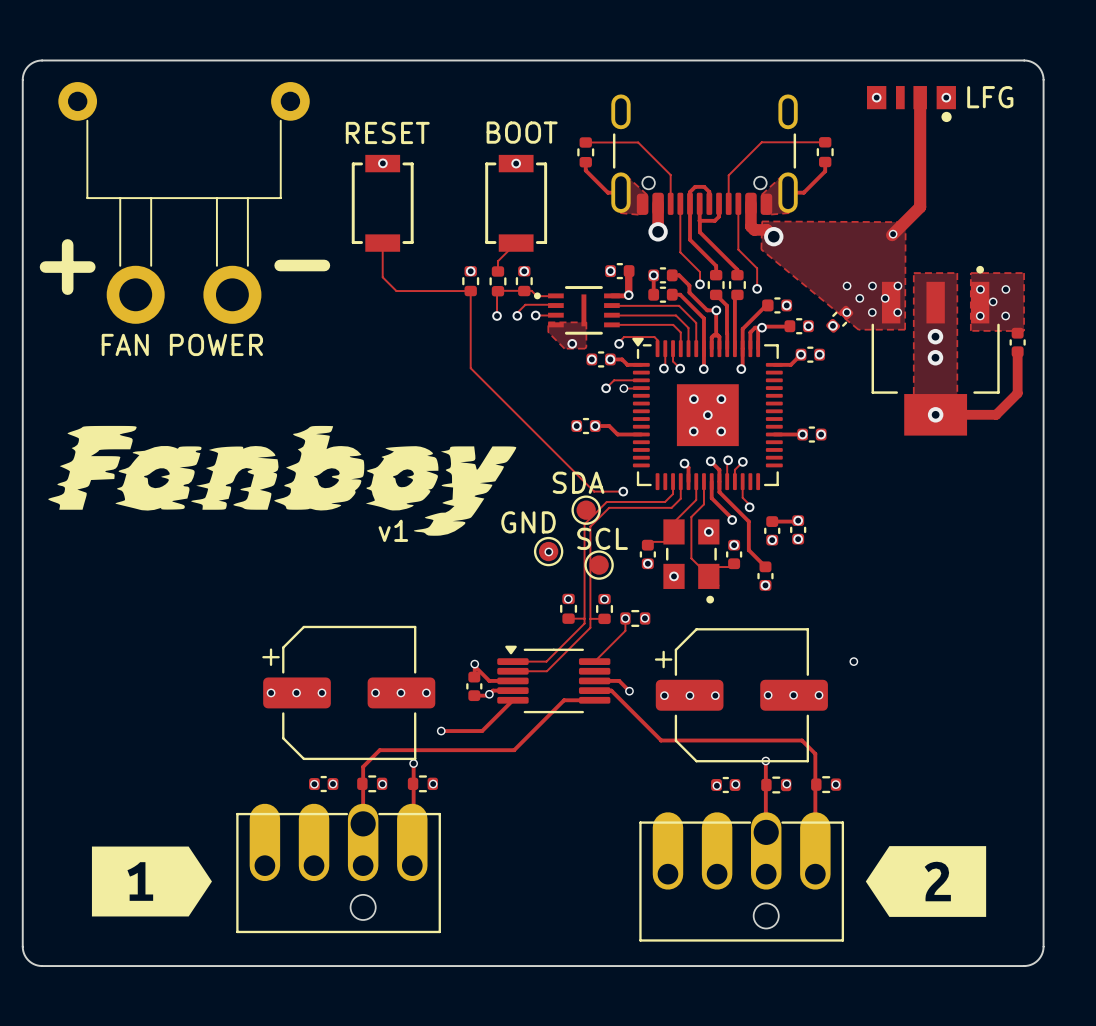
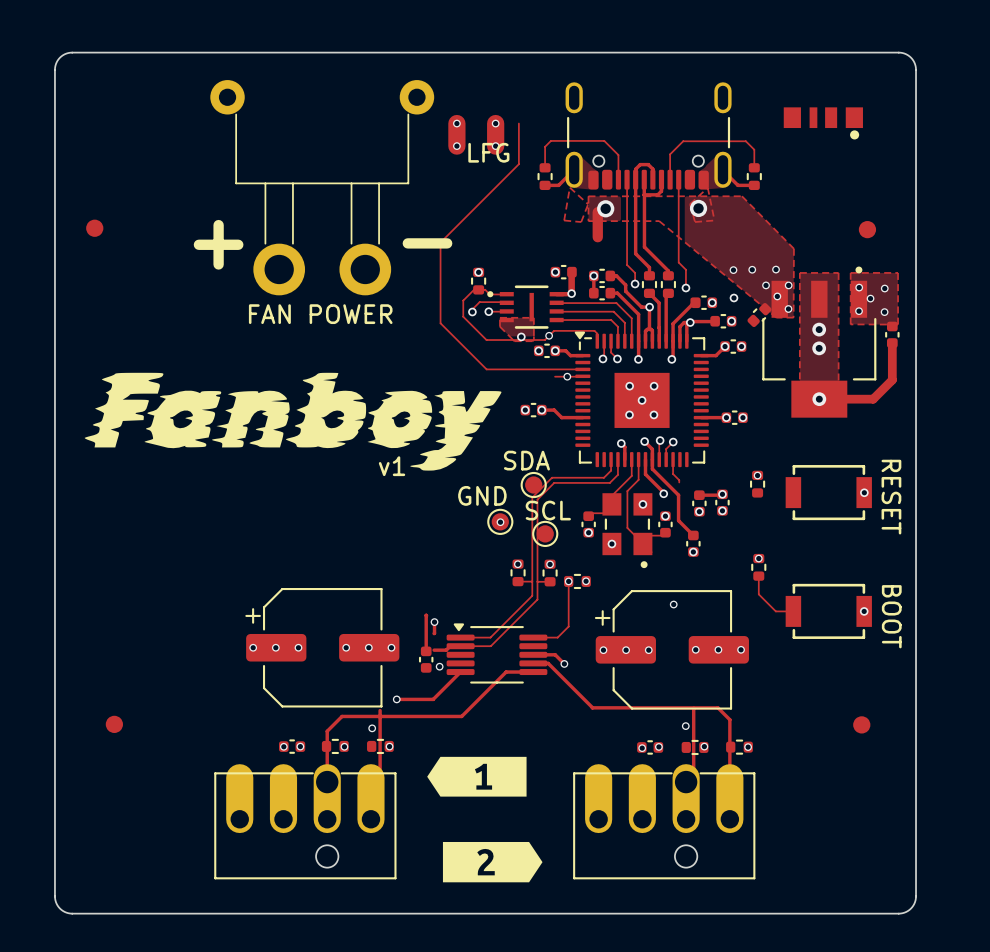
board edge: (42, 60) (1024, 60) (1037, 66) (1043, 79) (1043, 946) (1037, 960) (1024, 966) (42, 966) (28, 960) (22, 946) (22, 79) (28, 66) (42, 60) -> (72, 52) (60, 57) (54, 69) (54, 896) (60, 908) (72, 913) (898, 913) (910, 908) (916, 896) (916, 69) (910, 57) (898, 52) (72, 52)
via: (876, 97) -> none
track: (920, 97) (920, 207) (892, 235) -> none
via: (946, 97) -> none
text position: LFG (990, 97) -> LFG (488, 152)
track: none -> (456, 123) (456, 146)
via: none -> (456, 123)
track: none -> (495, 123) (495, 146)
via: none -> (495, 123)
via: none -> (456, 146)
via: none -> (495, 146)
text: RESET (387, 132) -> none
text: BOOT (522, 132) -> none
track: (585, 142) (638, 142) (670, 174) (670, 203) -> none
track: (825, 142) (761, 142) (728, 175) (728, 203) -> none
part position: (585, 152) -> (545, 176)
part position: (825, 152) -> (754, 176)
track: none -> (545, 167) (545, 146) (550, 140) (604, 140) (618, 155) (618, 179)
track: none -> (754, 167) (754, 149) (745, 141) (683, 141) (670, 154) (670, 179)
part position: (704, 154) -> (648, 135)
track: none -> (574, 169) (558, 185) (545, 185)
track: none -> (722, 169) (737, 185) (754, 185)
track: (585, 162) (585, 170) (607, 192) (620, 192) -> none
track: (825, 162) (825, 171) (803, 192) (788, 192) -> none
via: (382, 163) -> none
via: (516, 163) -> none
zone outline: none -> (742, 196) (793, 248) (793, 317) (776, 317) (659, 221) (588, 221) (588, 196) (742, 196)
part position: (184, 202) -> (322, 187)
part: (382, 203) -> none
part: (516, 203) -> none
track: (680, 203) (680, 252) (690, 262) -> (627, 179) (627, 264)
track: (750, 203) (750, 226) (754, 229) (767, 229) (773, 236) -> none
track: (737, 204) (738, 249) (749, 260) -> (678, 180) (678, 262)
track: (699, 205) (699, 220) (714, 220) (719, 216) (719, 205) -> (644, 181) (644, 194) (657, 194) (661, 191) (661, 181)
track: (709, 205) (709, 192) (704, 186) (695, 186) (690, 192) (690, 239) (700, 250) -> (652, 181) (652, 169) (648, 164) (640, 164) (635, 169) (635, 253)
part: none -> (94, 228)
track: (699, 221) (699, 232) (710, 242) -> (644, 195) (644, 247)
zone outline: (762, 221) (761, 249) (858, 329) (905, 329) (905, 222) (762, 221) -> none
part: none -> (867, 229)
via position: (658, 231) -> (605, 208)
via: (893, 234) -> none
via position: (773, 236) -> (698, 208)
track: (382, 243) (382, 277) (396, 291) (470, 291) (470, 368) (594, 491) (623, 491) -> none
track: (516, 243) (497, 261) (497, 271) -> none
text position: - (302, 265) -> - (427, 243)
text position: + (67, 267) -> + (218, 244)
via: none -> (733, 270)
via: none -> (752, 269)
via: none -> (776, 269)
via: (470, 271) -> none
zone outline: (913, 273) (957, 273) (957, 405) (913, 405) (913, 273) -> (799, 272) (838, 272) (838, 390) (799, 390) (799, 272)
zone outline: (970, 273) (1024, 273) (1024, 331) (970, 330) (970, 273) -> (850, 272) (898, 272) (898, 324) (850, 324) (850, 272)
part: (470, 281) -> none
part: (497, 281) -> none
via: (897, 286) -> none
via: none -> (859, 287)
via: (1005, 289) -> none
track: (531, 290) (498, 290) (497, 315) -> none
via: (885, 298) -> none
via: none -> (870, 298)
via: (993, 301) -> none
via: (846, 312) -> none
via: (897, 312) -> none
via: none -> (859, 311)
via: (497, 315) -> none
via: (1005, 315) -> none
via position: (832, 325) -> (733, 297)
via: none -> (819, 329)
via: (935, 336) -> none
track: (624, 337) (619, 343) -> (567, 330) (554, 330) (544, 340) (486, 340) (463, 316) (463, 300) (473, 289) (484, 289)
via: none -> (549, 335)
part position: (1017, 342) -> (892, 334)
via: (619, 343) -> none
text position: FAN POWER (182, 344) -> FAN POWER (320, 314)
part position: (935, 350) -> (819, 342)
track: (1017, 351) (1017, 393) (996, 414) (935, 414) -> (892, 343) (892, 380) (873, 399) (819, 399)
via: none -> (819, 348)
via: (935, 357) -> none
track: (614, 380) (606, 388) -> (558, 369) (486, 369) (440, 323) (440, 242) (518, 164) (518, 123)
via: (606, 388) -> none
track: none -> (555, 376) (567, 376)
via position: (935, 414) -> (819, 399)
drawing position: (282, 480) -> (293, 421)
via: (623, 491) -> none
via: none -> (757, 475)
via: (749, 507) -> none
part: none -> (757, 484)
part: none -> (828, 492)
via: none -> (864, 492)
text: none -> RESET (891, 497)
text position: v1 (393, 530) -> v1 (392, 466)
via: none -> (758, 558)
part: none -> (758, 567)
track: none -> (758, 576) (758, 594) (775, 611) (793, 611)
track: (584, 623) (546, 661) (512, 661) -> (532, 585) (532, 595) (490, 637) (460, 637)
track: (590, 627) (546, 671) (512, 671) -> (537, 589) (537, 599) (490, 646) (460, 646)
track: (625, 630) (594, 661) -> (568, 592) (568, 626) (557, 637) (533, 637)
via: none -> (673, 604)
part: none -> (828, 611)
via: none -> (864, 611)
track: none -> (426, 615) (426, 650)
text: none -> BOOT (891, 616)
via: (853, 661) -> none
track: (474, 666) (489, 680) (512, 680) -> none
part position: (553, 679) -> (496, 653)
track: (594, 680) (619, 680) (629, 691) -> (533, 654) (555, 654) (564, 663)
part position: (474, 686) -> (426, 659)
track: (594, 690) (611, 690) (661, 740) -> (533, 663) (548, 663) (592, 707)
via position: (629, 691) -> (564, 663)
via: (489, 694) -> none
track: (512, 700) (482, 731) (441, 731) -> (460, 672) (433, 699) (396, 699)
track: (594, 700) (564, 700) (514, 750) (379, 750) (363, 766) (363, 823) -> (533, 672) (506, 672) (461, 716) (342, 716) (327, 731) (327, 782)
via: none -> (439, 666)
via: (441, 731) -> none
track: (661, 740) (802, 740) (815, 753) (815, 874) -> (592, 707) (717, 707) (729, 719) (729, 826)
via: none -> (396, 699)
via: (765, 761) -> none
via: (413, 763) -> none
part: none -> (114, 724)
part: none -> (861, 724)
via: none -> (685, 726)
part position: (372, 783) -> (335, 746)
via: none -> (372, 728)
part position: (422, 783) -> (380, 746)
via: (314, 784) -> none
part position: (323, 784) -> (292, 746)
via: (332, 784) -> none
via: (382, 784) -> none
via: (433, 784) -> none
via: (735, 784) -> none
via: (786, 784) -> none
part position: (826, 784) -> (739, 747)
via position: (835, 784) -> (748, 747)
via: (716, 785) -> none
part position: (725, 785) -> (650, 747)
part position: (776, 785) -> (695, 747)
via: none -> (300, 746)
via: none -> (389, 746)
via: none -> (704, 746)
via: none -> (283, 746)
via: none -> (344, 746)
via: none -> (658, 746)
via: none -> (642, 748)
drawing: none -> [427, 756, 527, 797]
drawing: [91, 846, 212, 917] -> none
drawing: [865, 846, 987, 917] -> none
part position: (338, 868) -> (305, 821)
part position: (741, 876) -> (664, 821)
drawing: none -> [442, 841, 543, 883]

